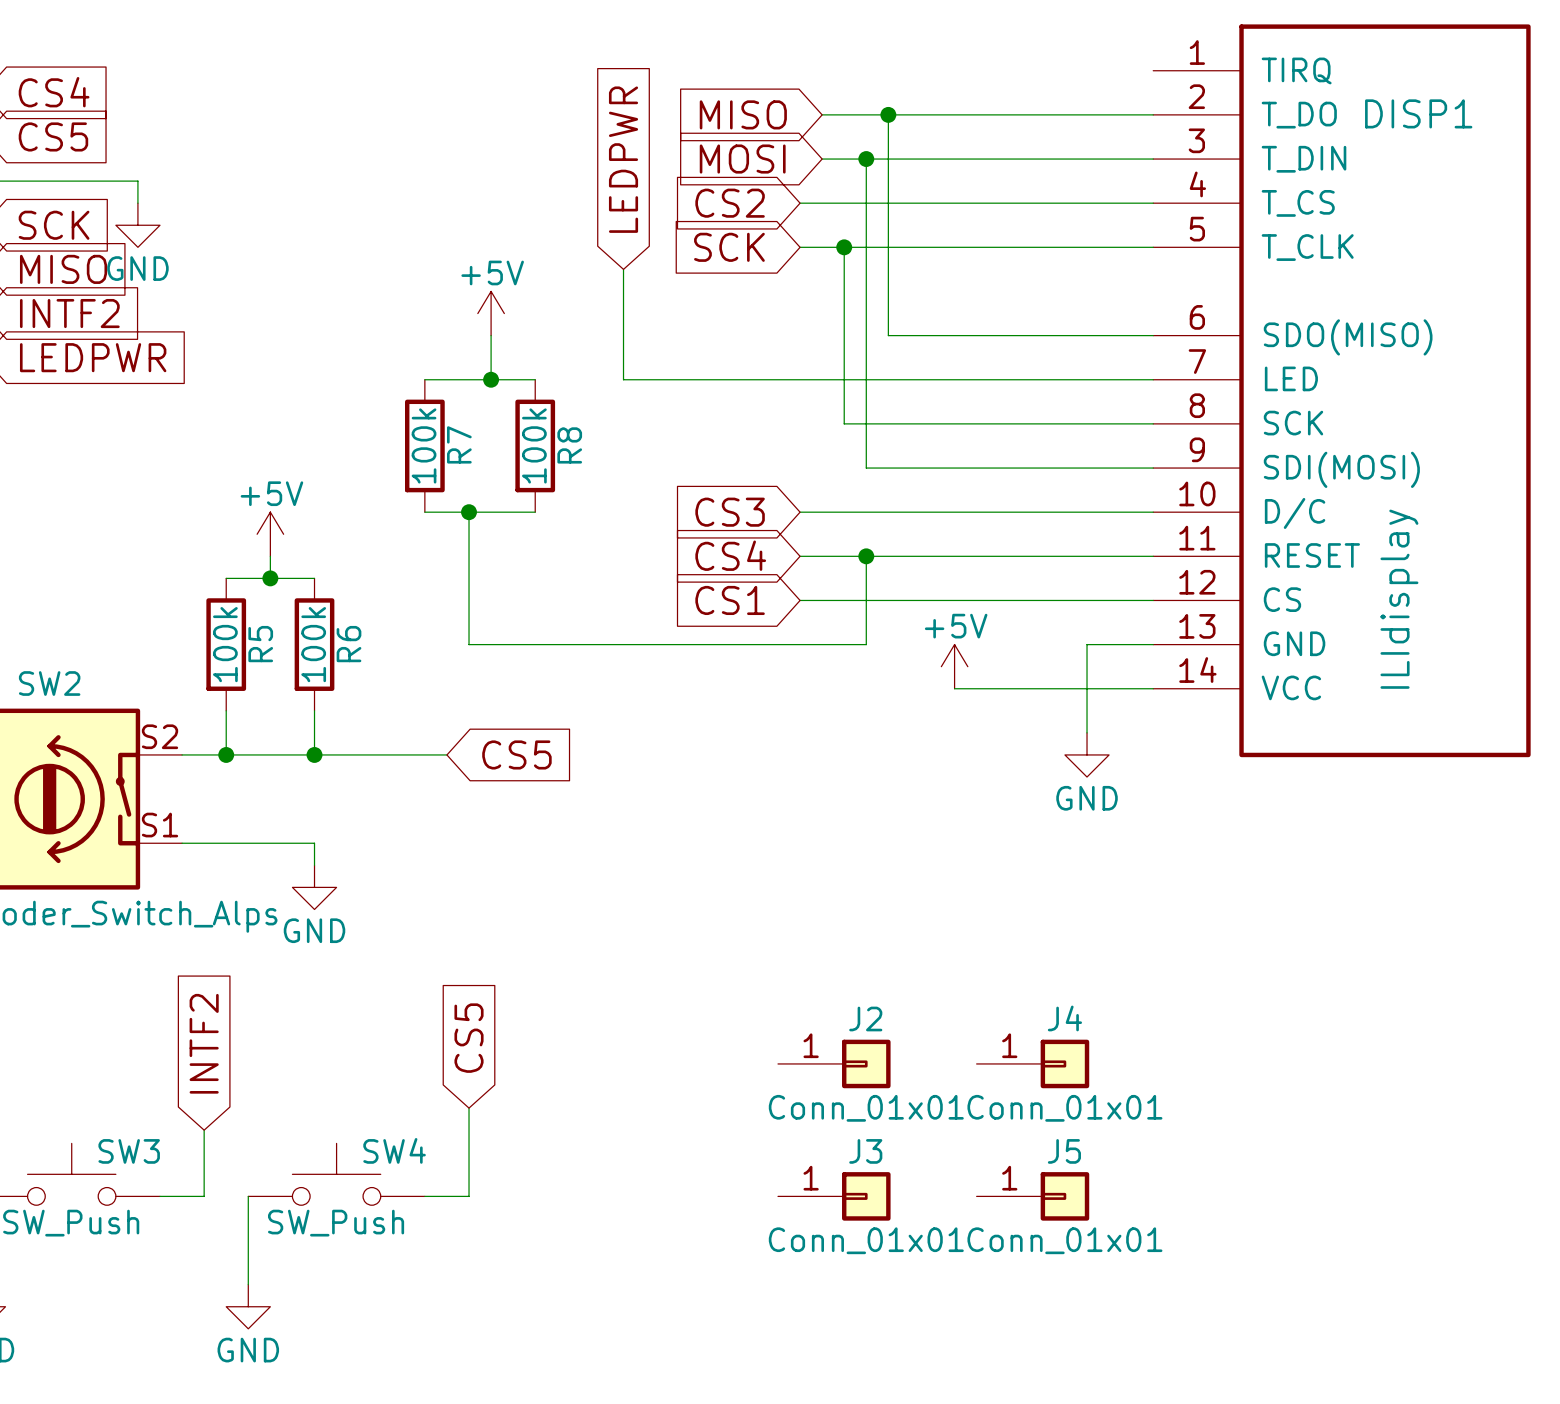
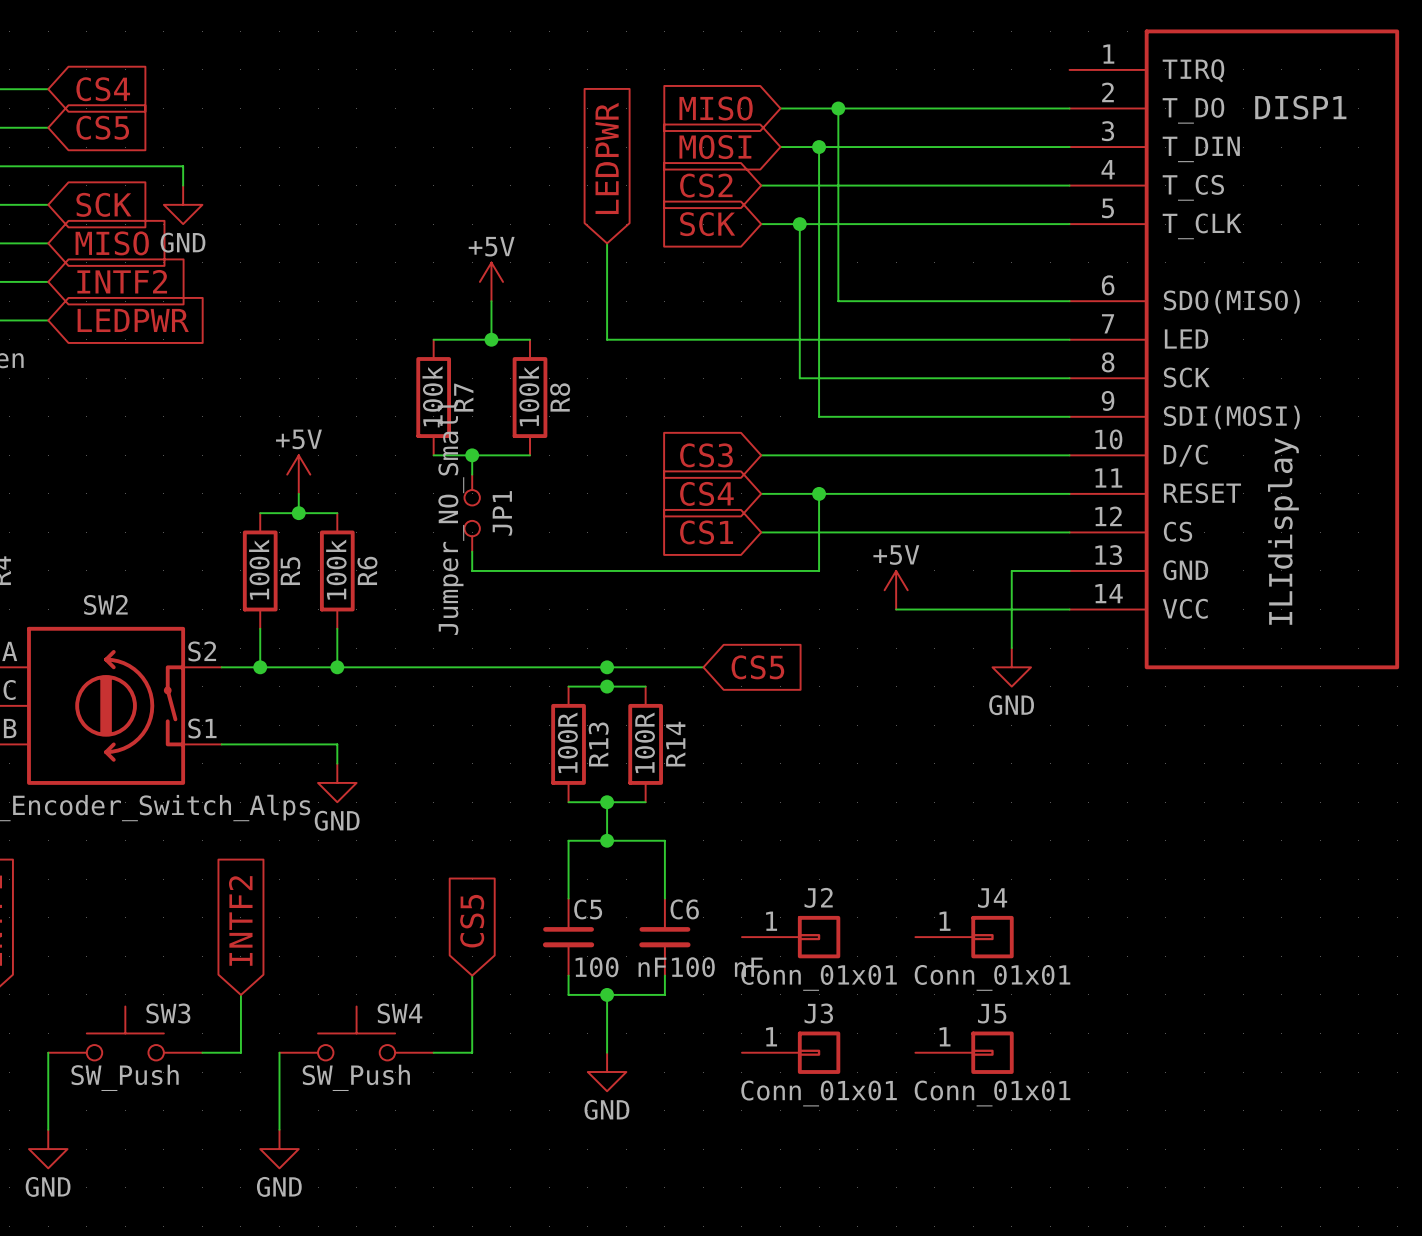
wire: (469, 534) (469, 622) -> none
JP1: none -> Jumper_NO_Small (472, 513)
wire: none -> (452, 667) (703, 667)
global label position: CS5 (516, 754) -> CS5 (757, 667)
junction: none -> (607, 667)
wire: none -> (568, 686) (645, 686)
junction: none -> (607, 686)
R13: none -> 100R (568, 744)
R14: none -> 100R (645, 744)
wire: none -> (568, 802) (645, 802)
wire: none -> (607, 802) (607, 840)
junction: none -> (607, 802)
junction: none -> (607, 840)
wire: none -> (568, 898) (568, 840) (664, 840) (664, 898)
C5: none -> 100 nF (568, 937)
C6: none -> 100 nF (664, 937)
wire: none -> (568, 975) (568, 994) (664, 994) (664, 975)
wire: none -> (607, 994) (607, 1052)
junction: none -> (607, 994)
power symbol: none -> GND (607, 1072)

